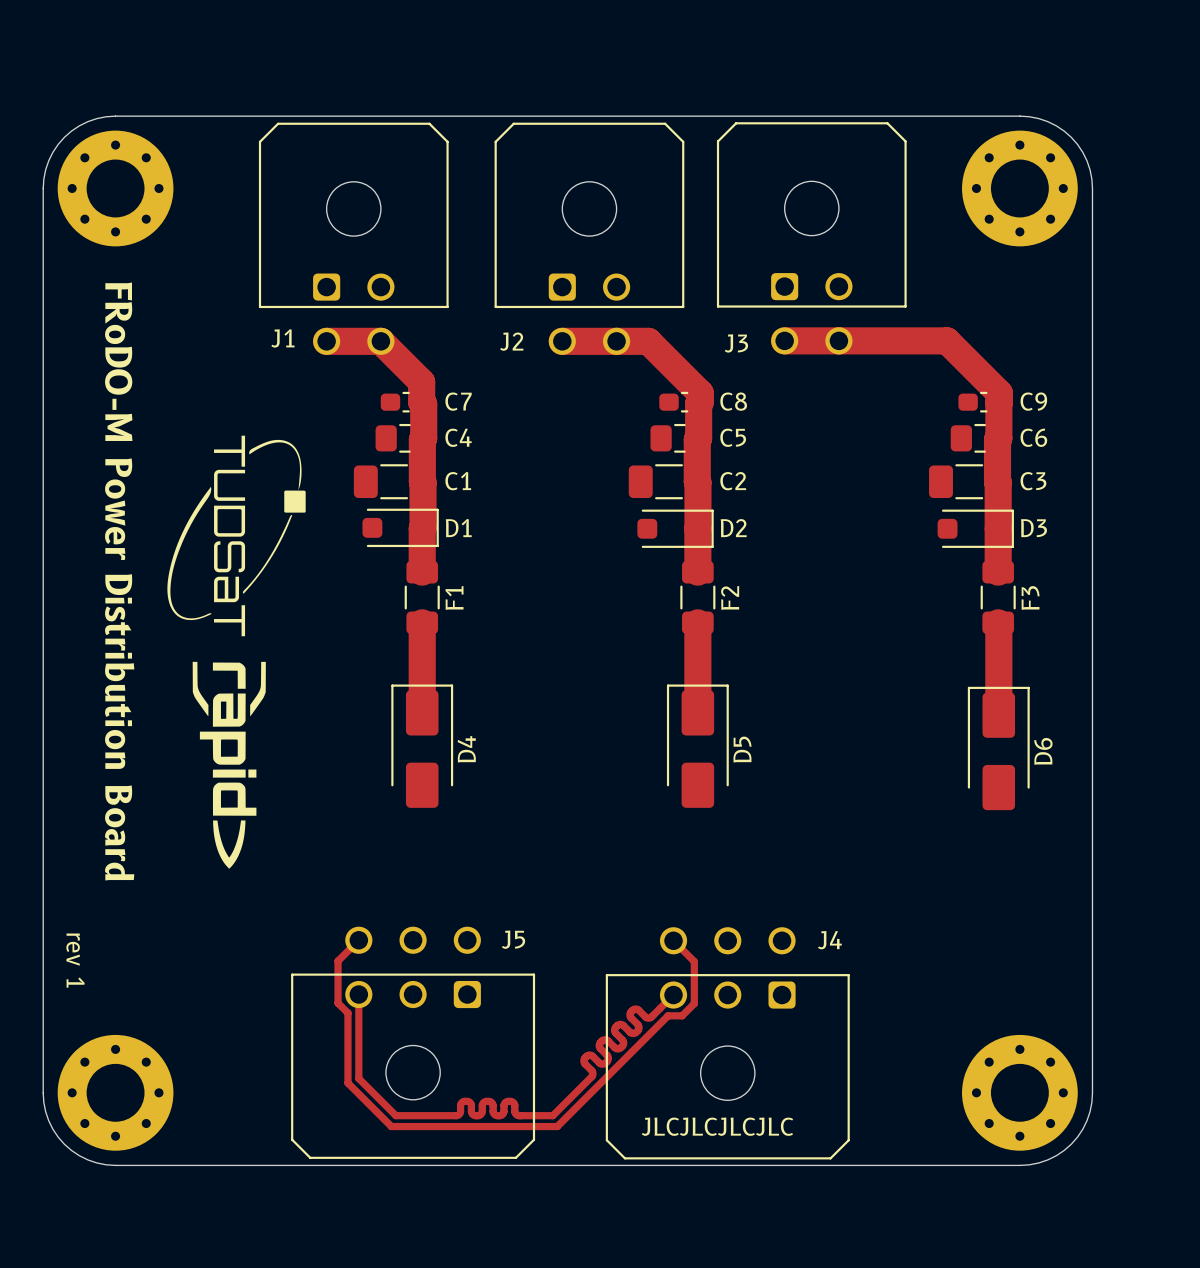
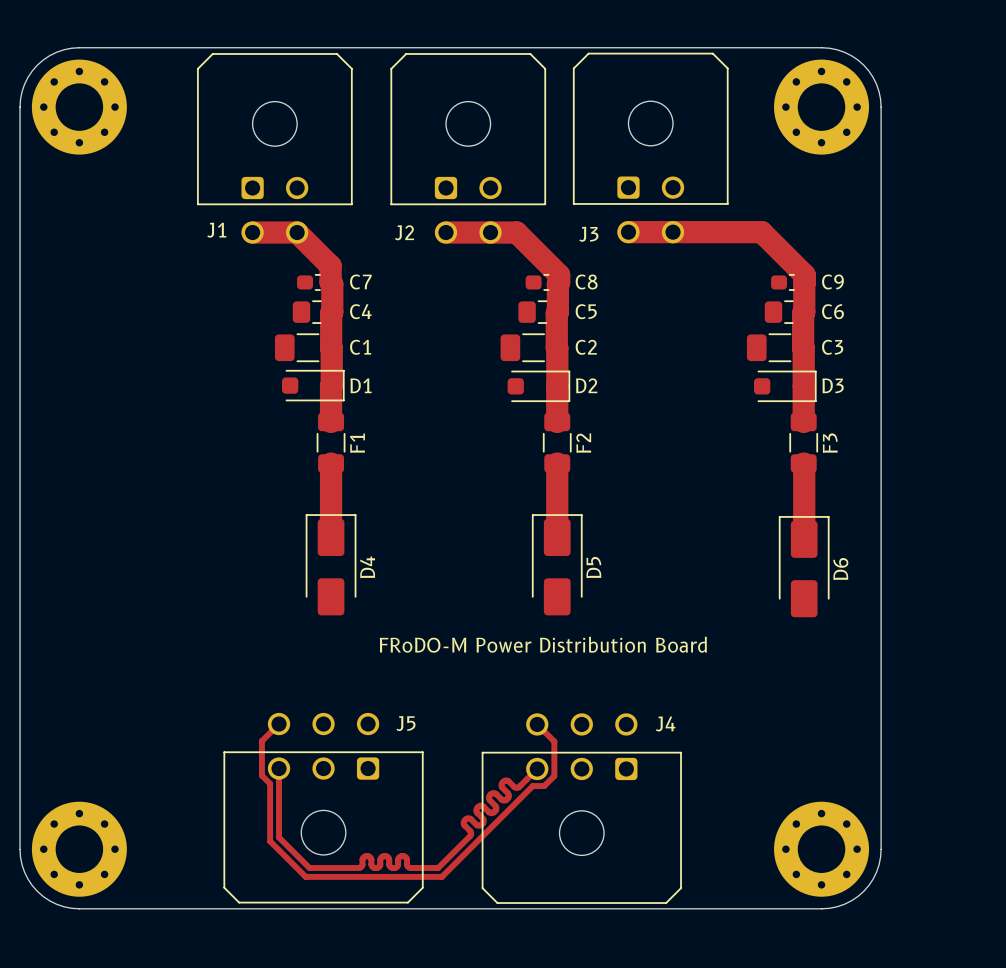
drawing: [167, 435, 306, 637] -> none
text: FRoDO-M Power Distribution Board (119, 581) -> none
drawing: [192, 661, 266, 869] -> none
text: none -> FRoDO-M Power Distribution Board (543, 644)
text: rev 1 (75, 960) -> none
text: JLCJLCJLCJLC (717, 1126) -> none

